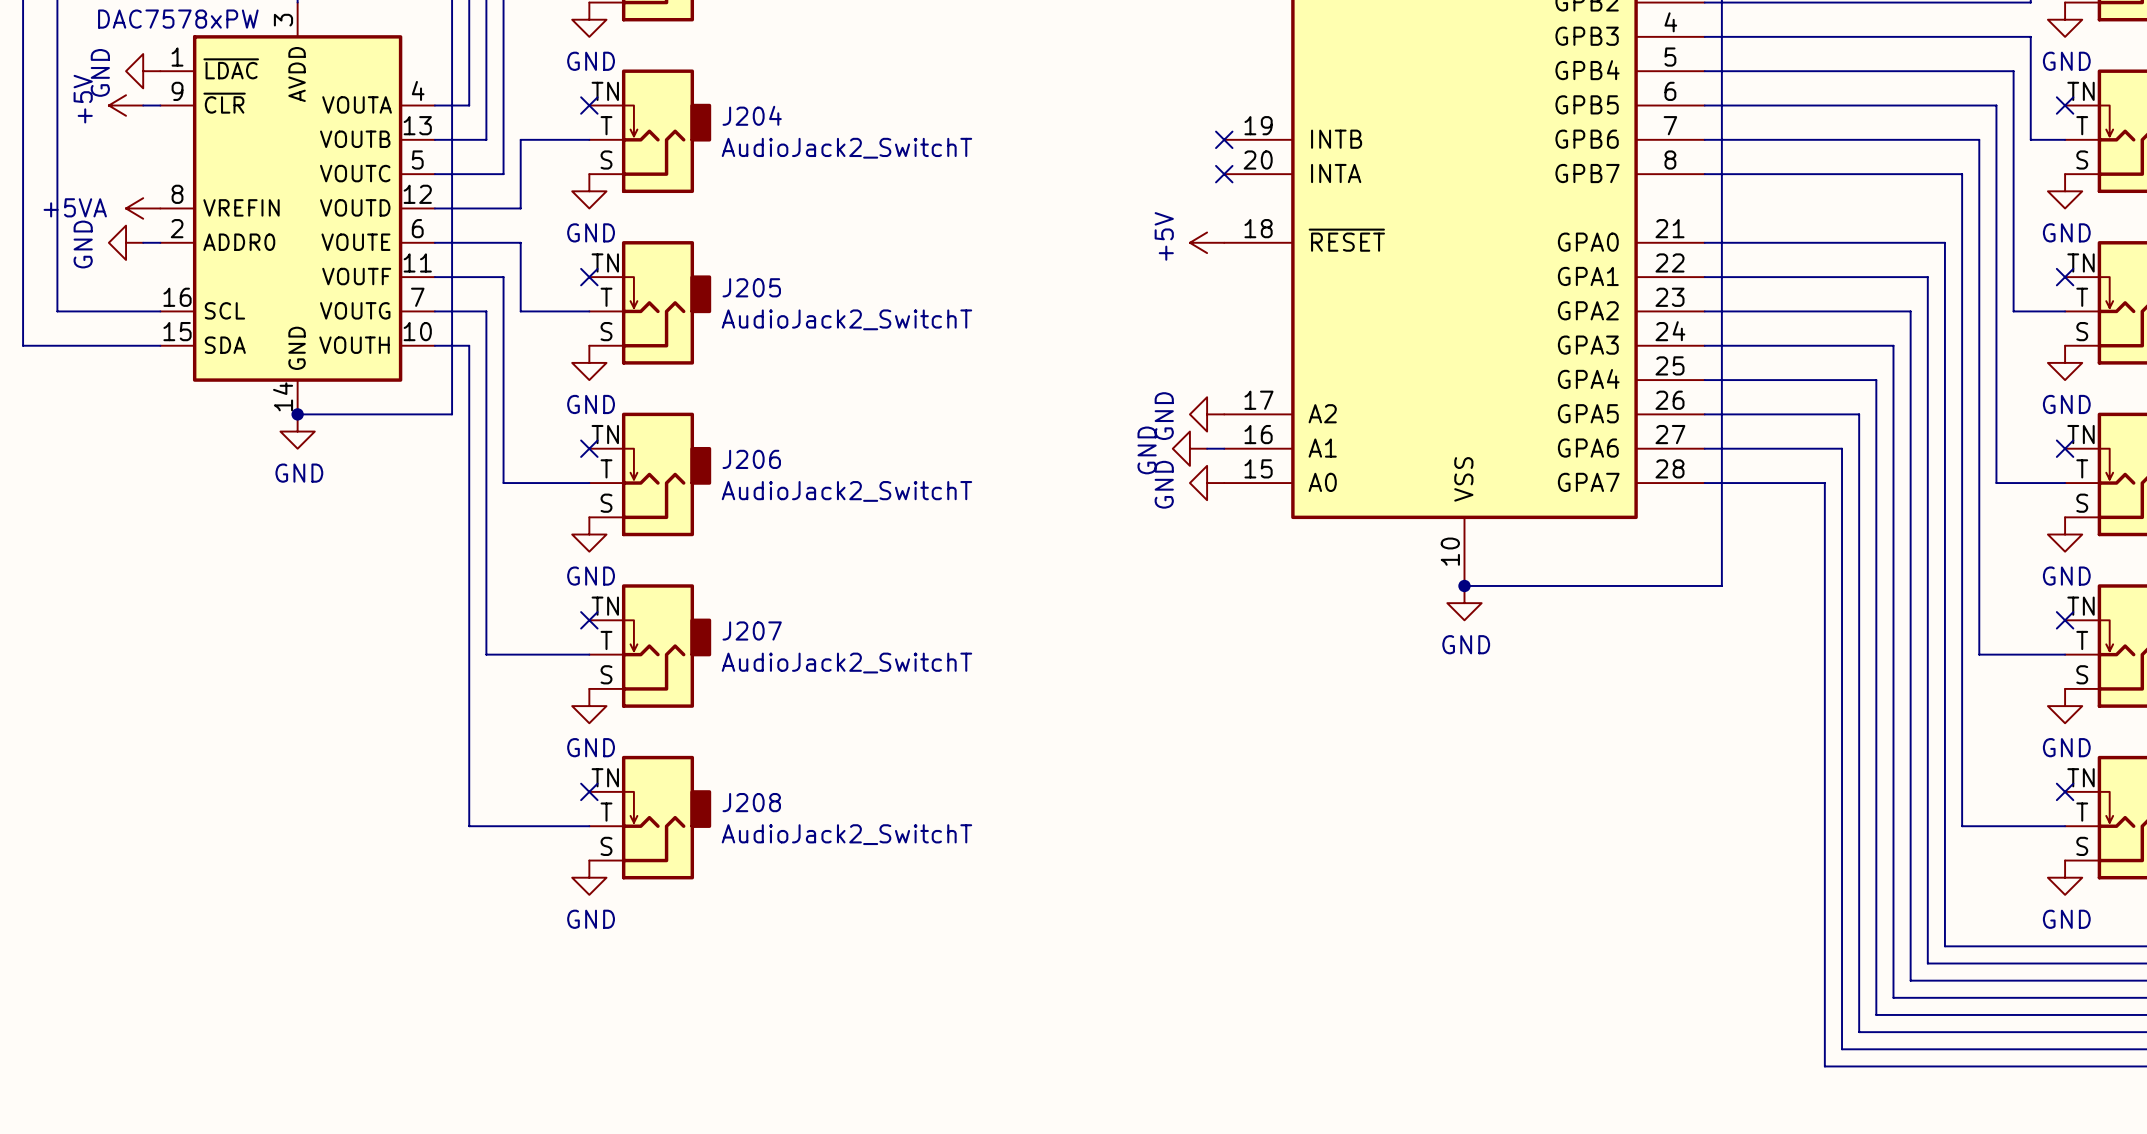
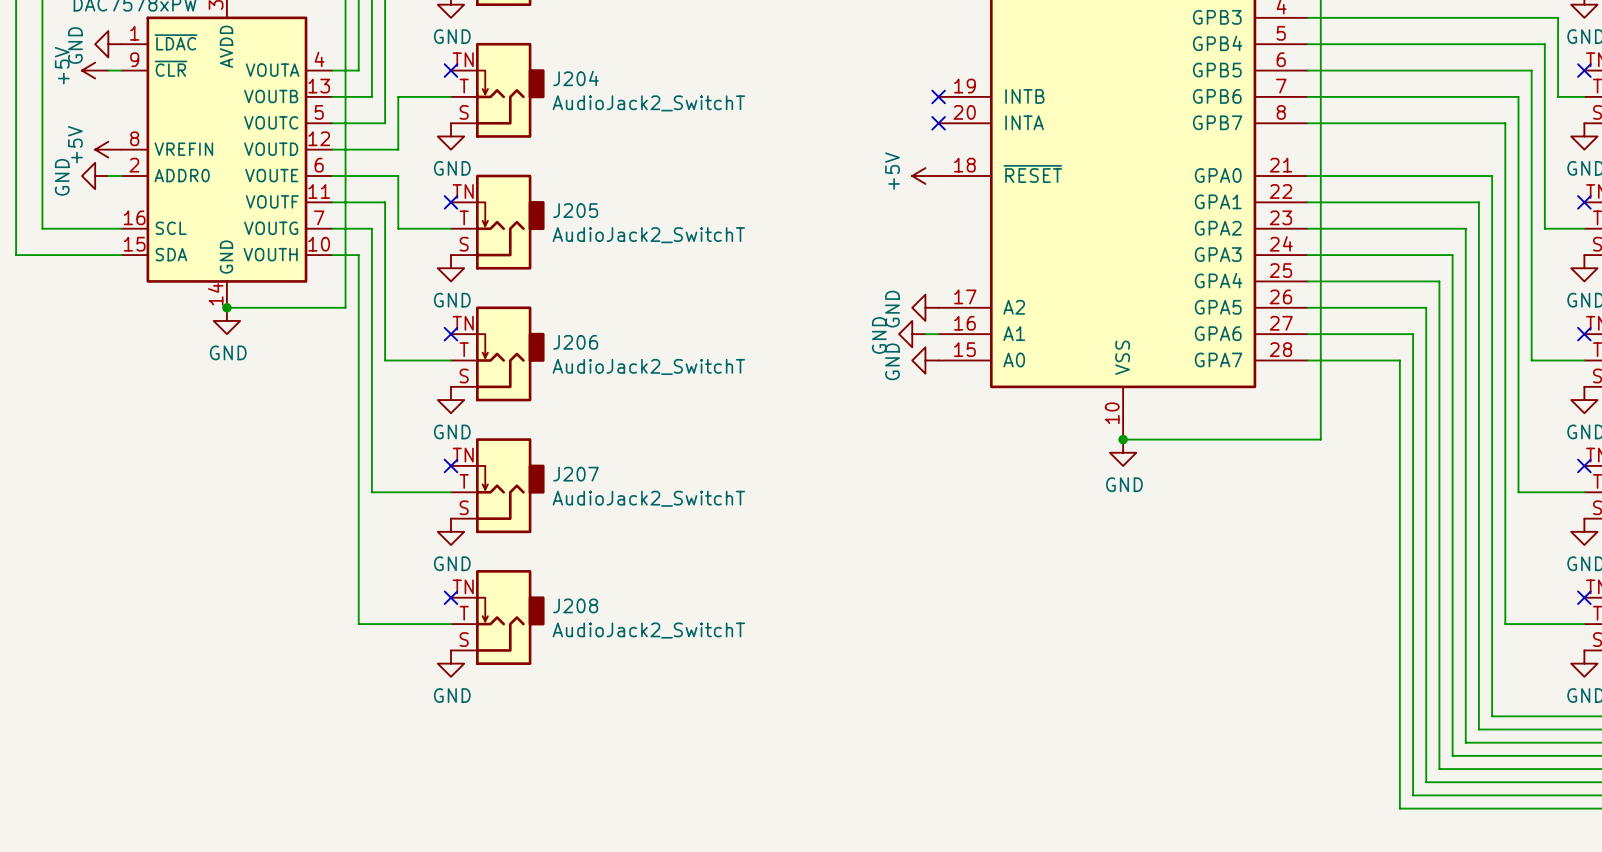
power symbol: +5VA (143, 208) -> +5V (108, 149)

